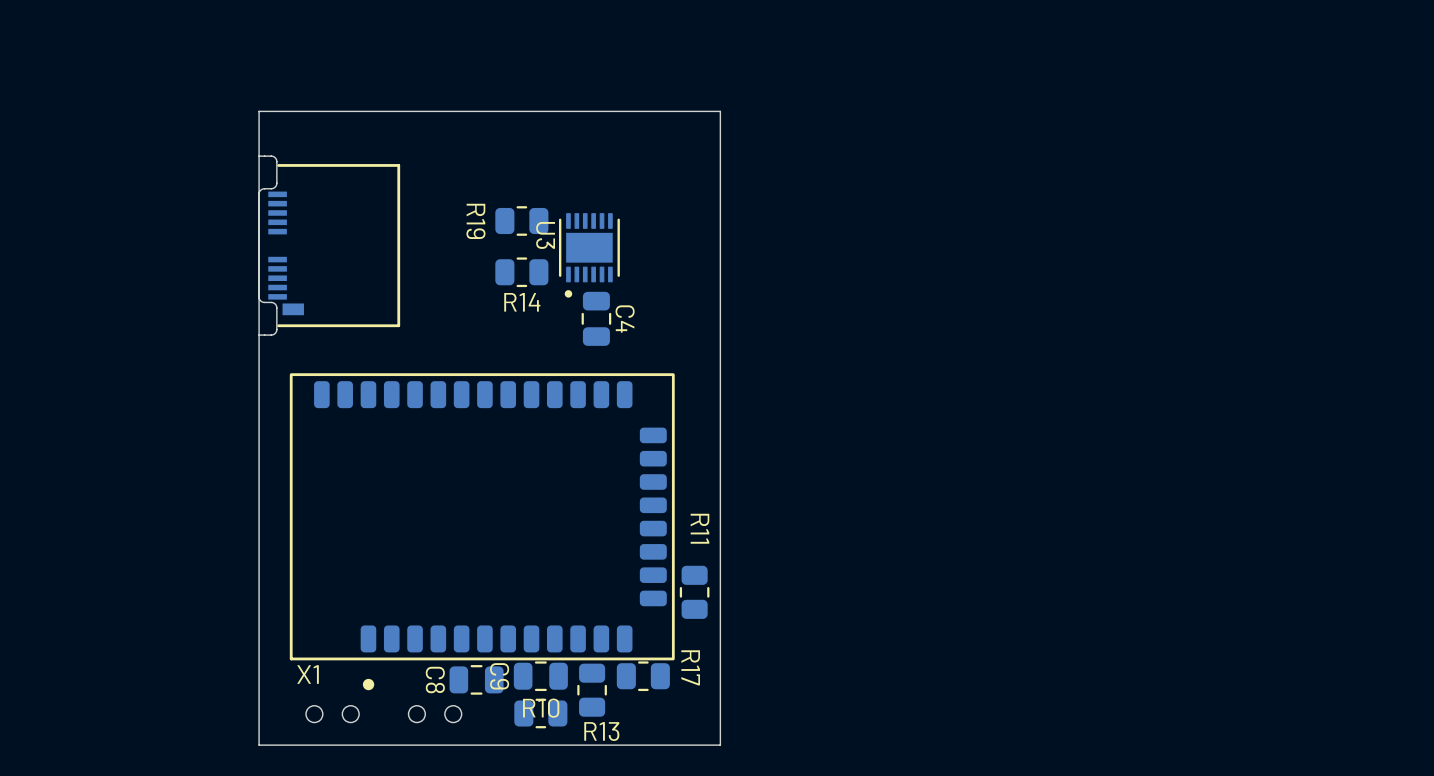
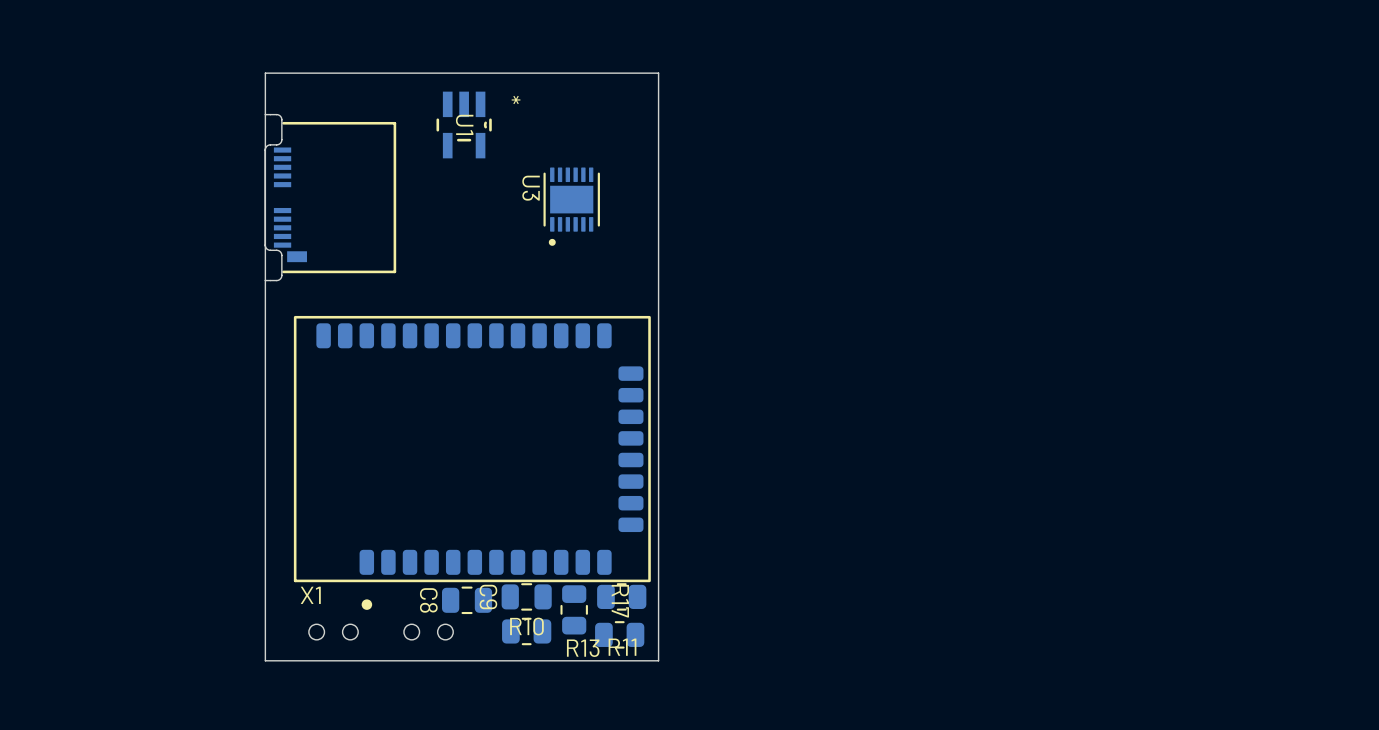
board edge: (683, 111) (720, 111) (720, 745) (683, 745) -> (658, 73) (658, 660)
U1: none -> (464, 124)
R19: (521, 220) -> none
R14: (521, 272) -> none
C4: (596, 318) -> none
R11 name position: R11 (699, 528) -> R11 (622, 647)
R11 rotation: 0° (694, 592) -> 90° clockwise (619, 634)
R11 position: (694, 592) -> (619, 634)
R17 name position: R17 (690, 667) -> R17 (620, 601)

